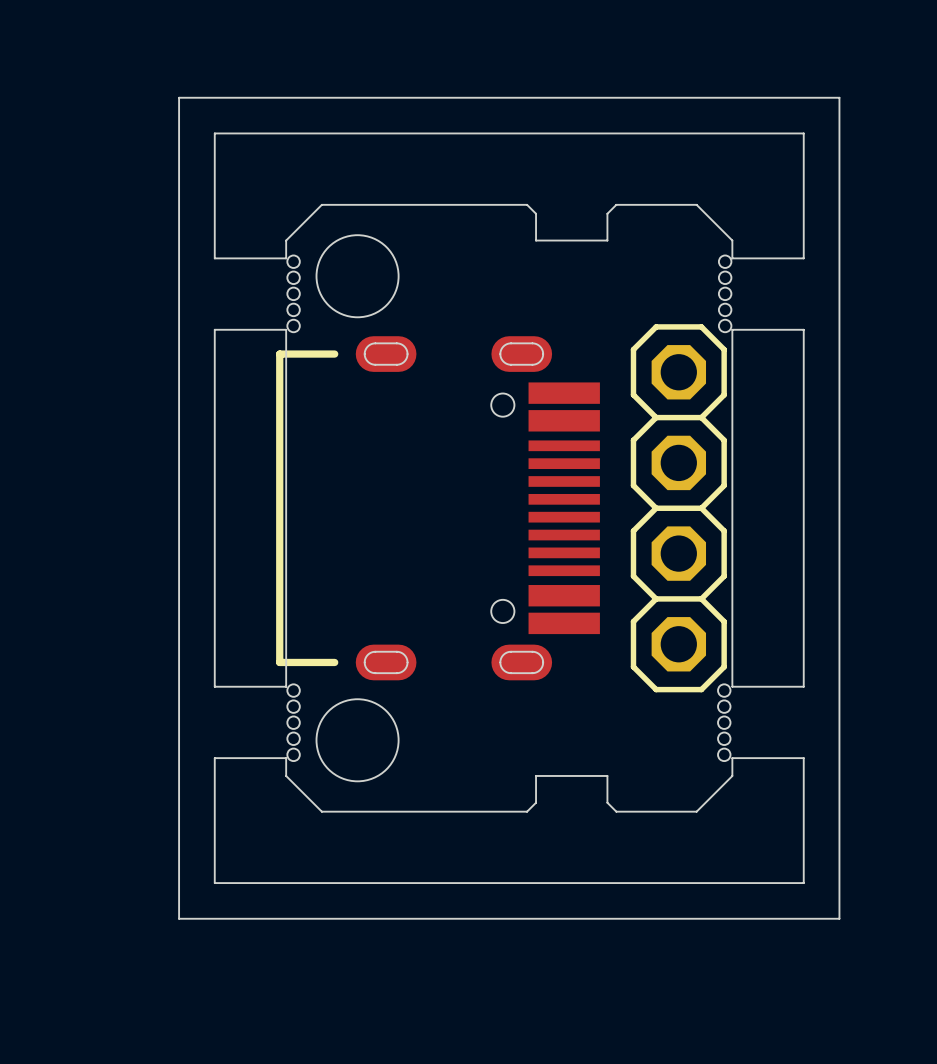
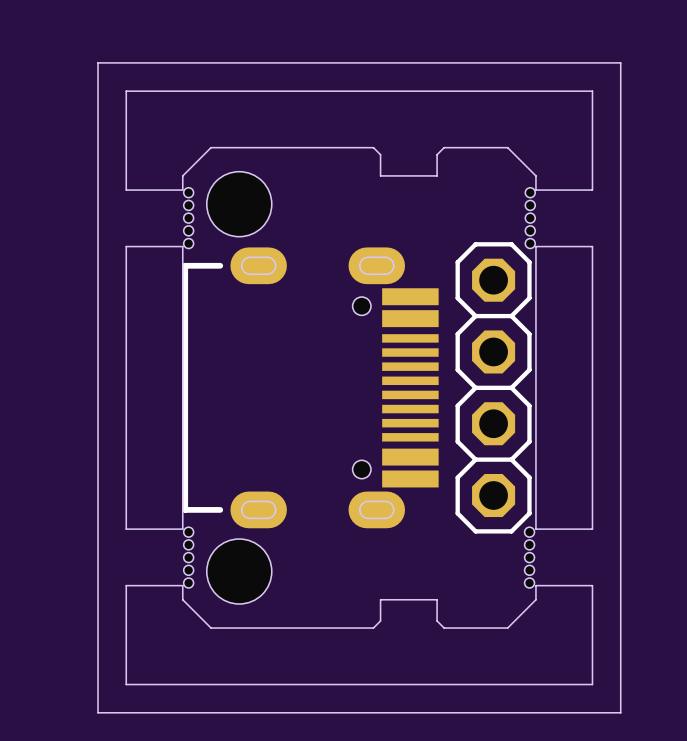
part footprint: [276, 336, 600, 681] -> [182, 247, 439, 529]

